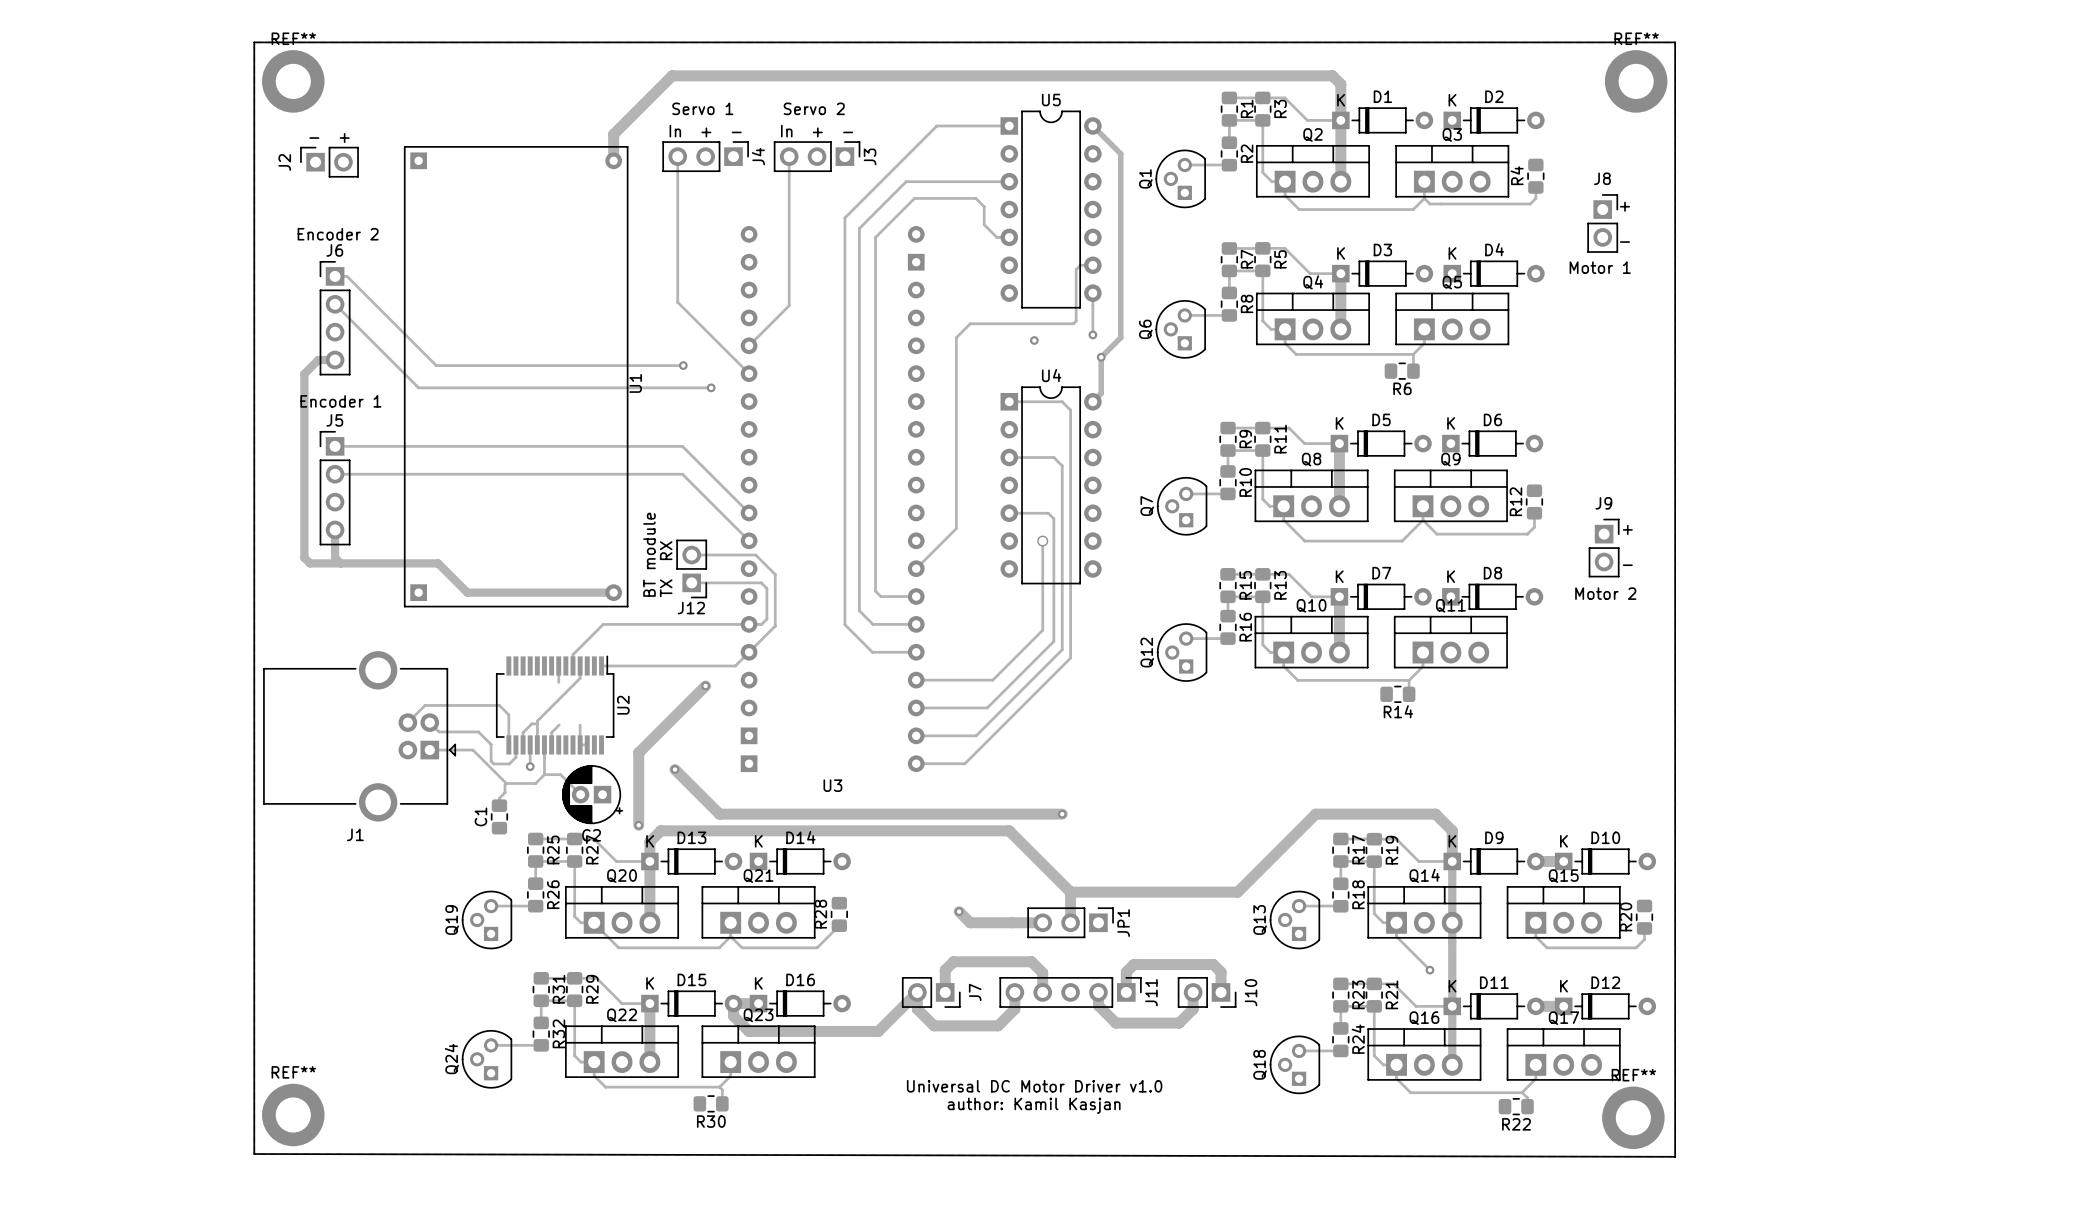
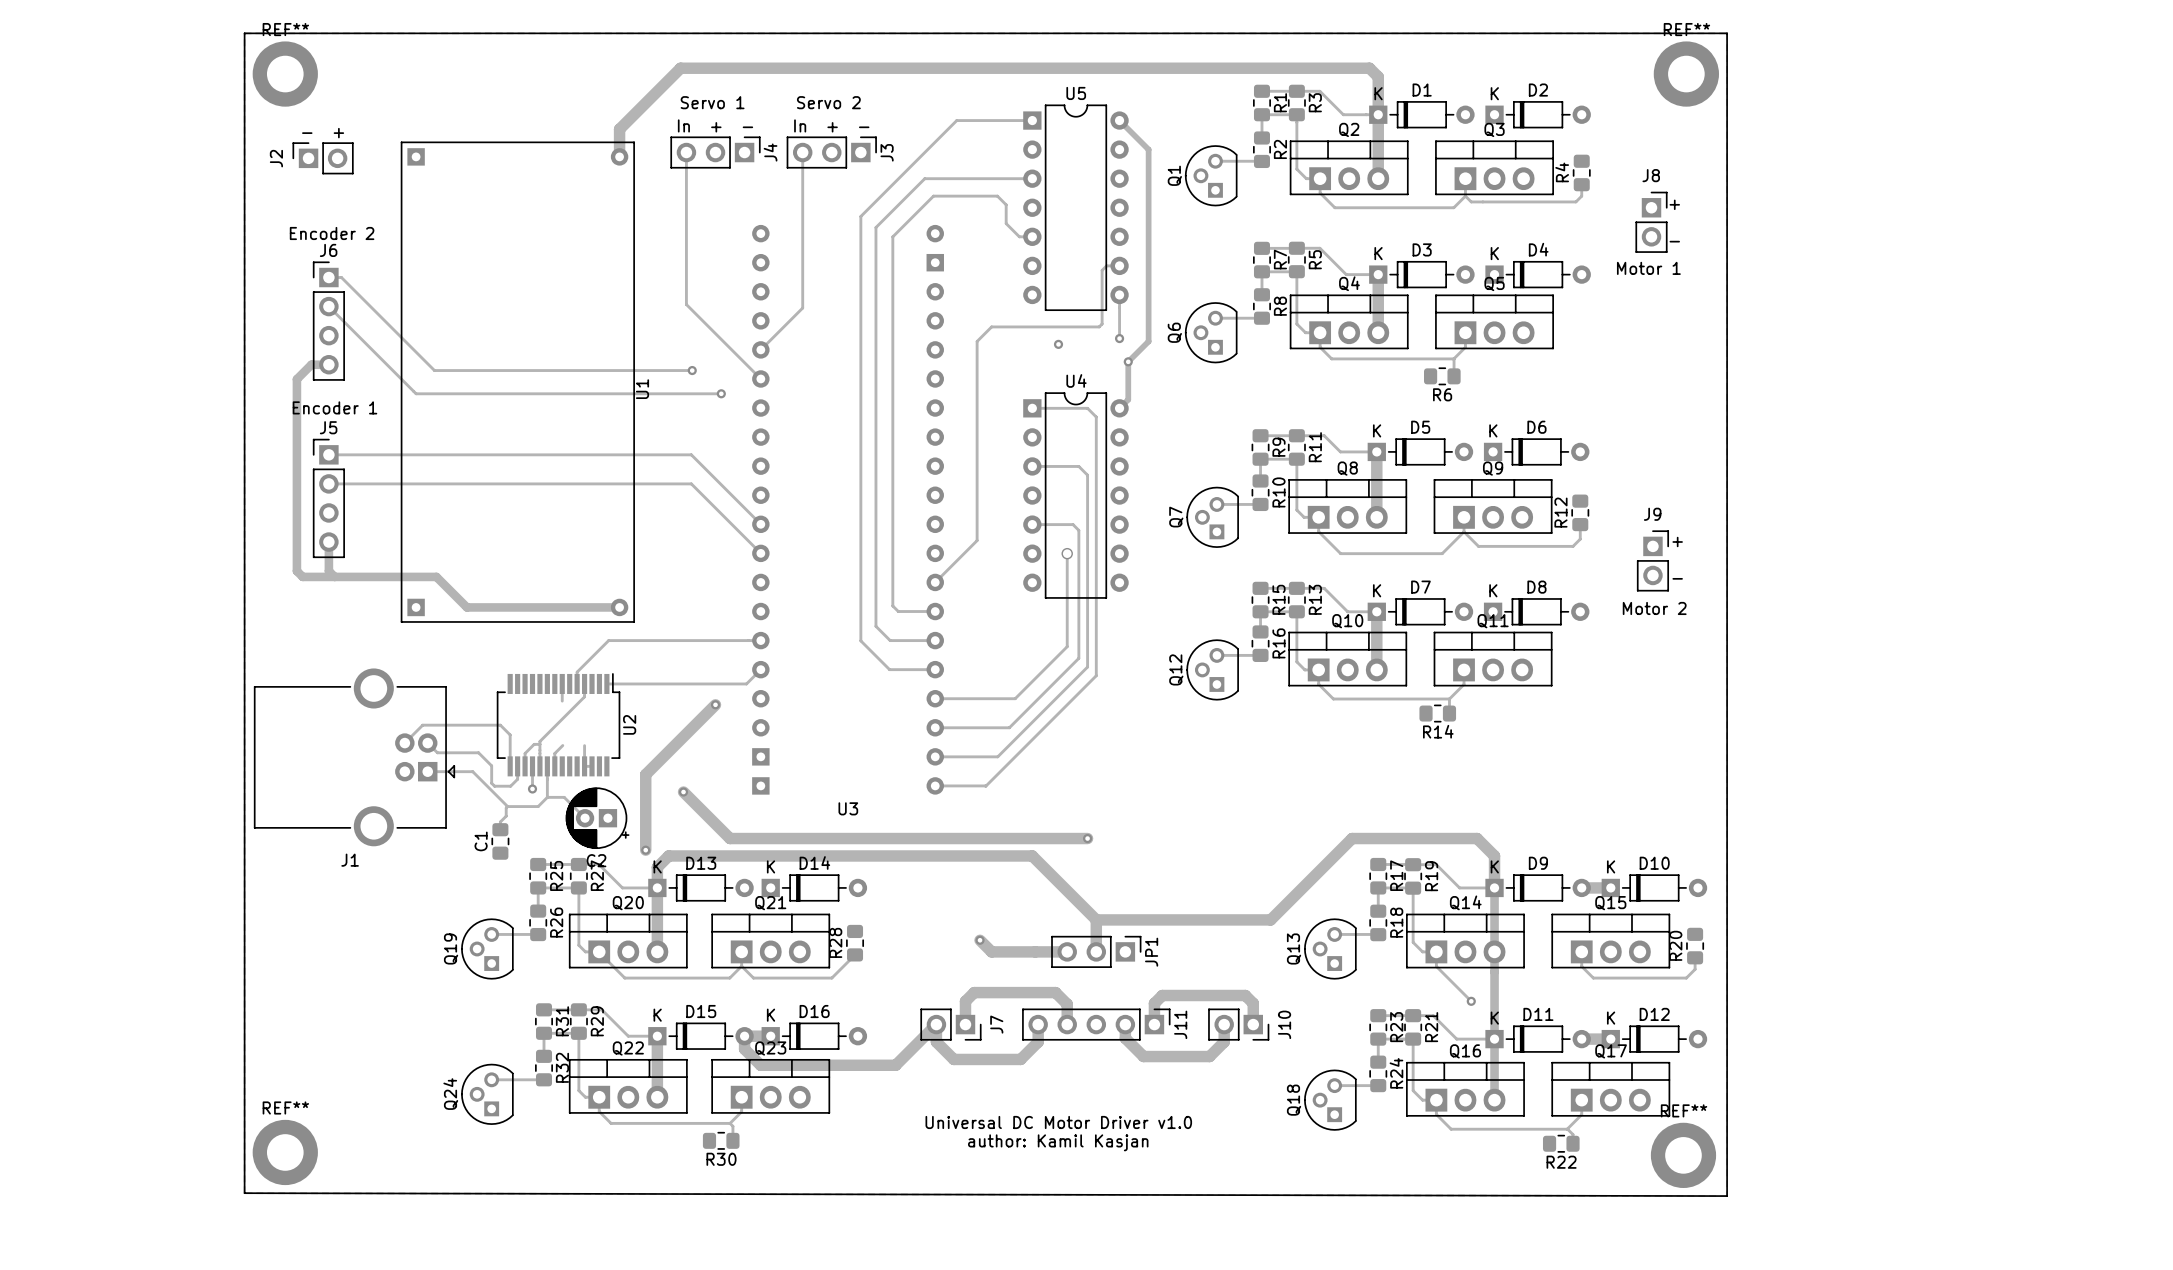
text: BT module (649, 554) -> none
track: (691, 555) (755, 555) (775, 574) (775, 626) (749, 652) -> none
J12: (691, 568) -> none
text: TX RX (666, 569) -> none
track: (691, 582) (761, 582) (766, 588) (766, 619) (761, 624) (749, 624) -> none

